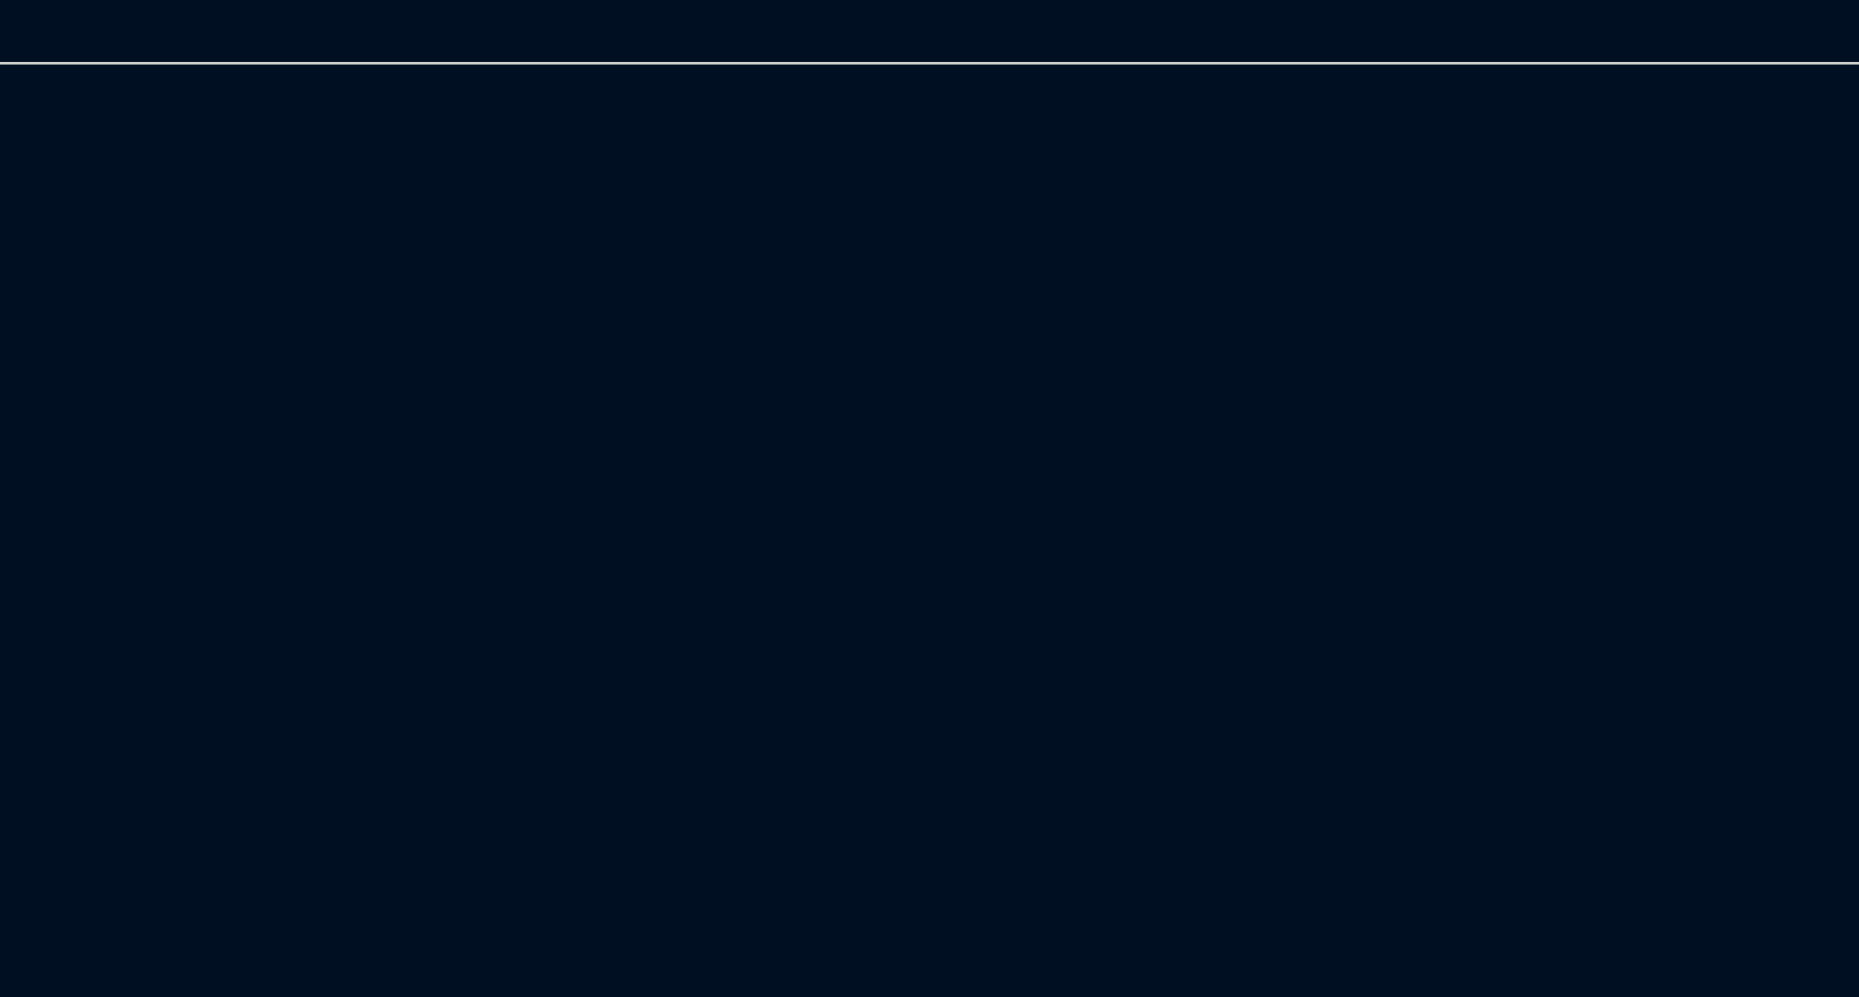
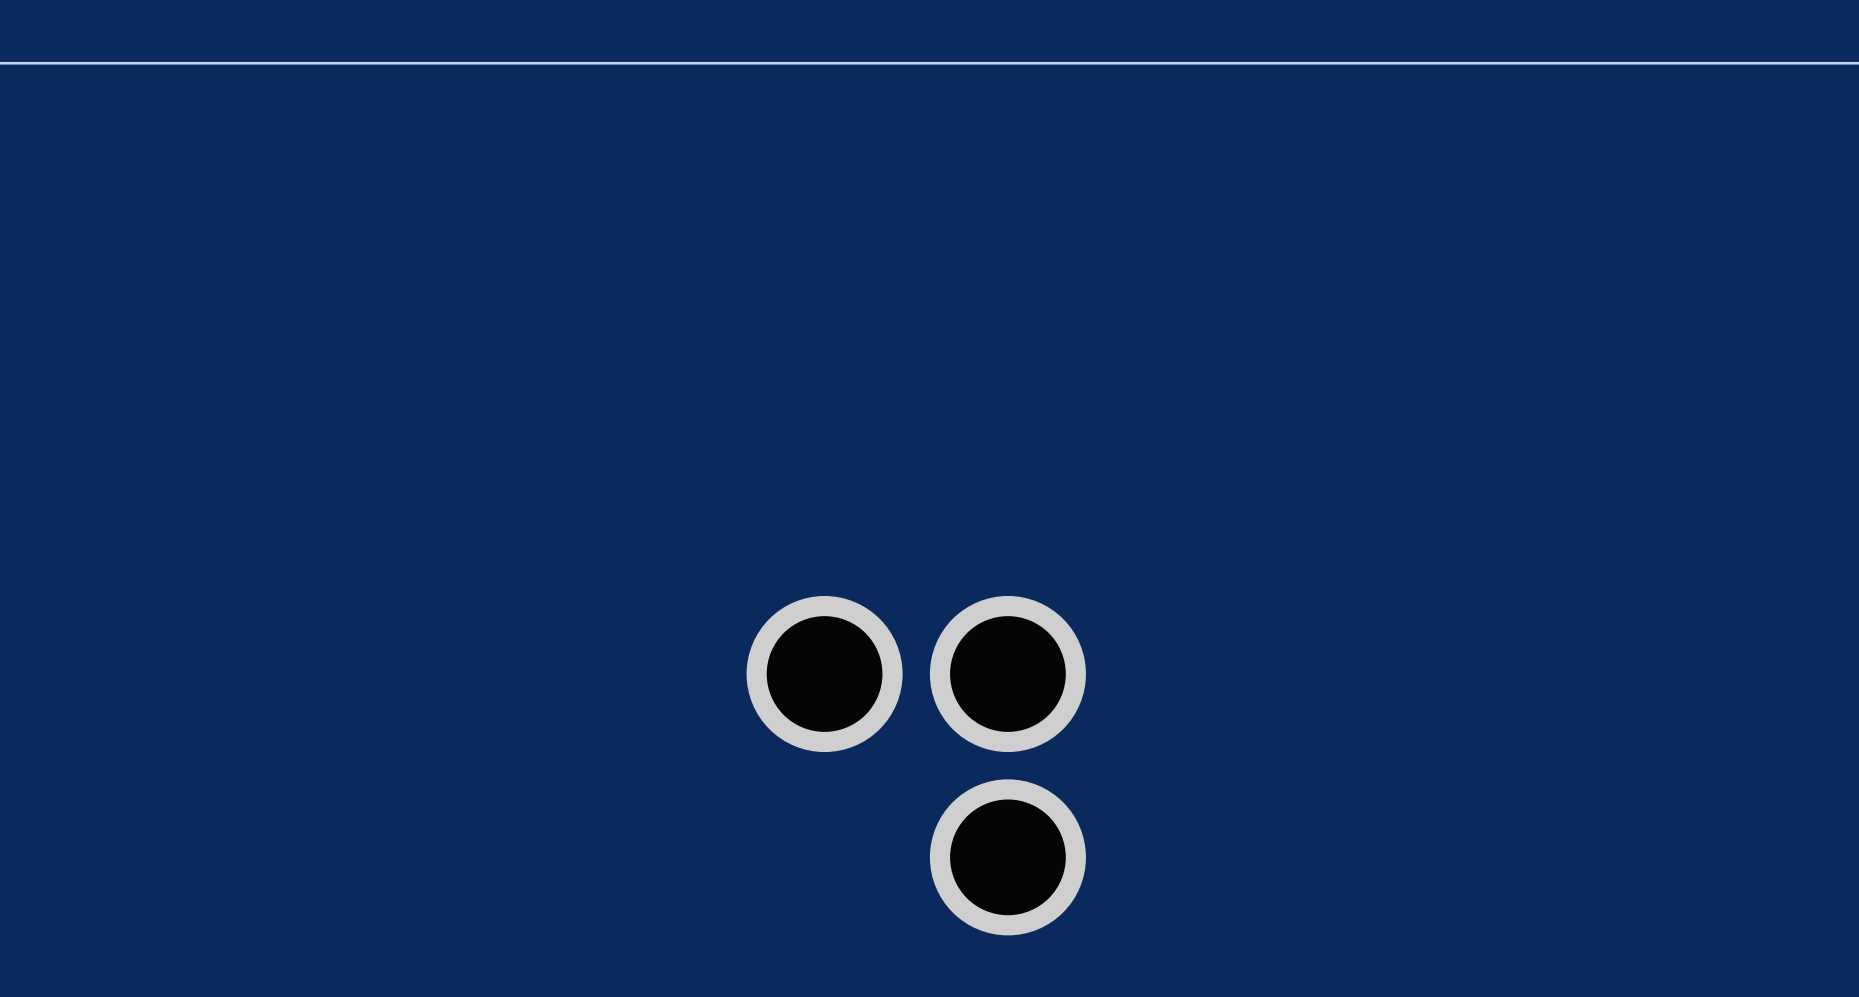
part: none -> (824, 674)
part: none -> (1007, 674)
part: none -> (1007, 857)

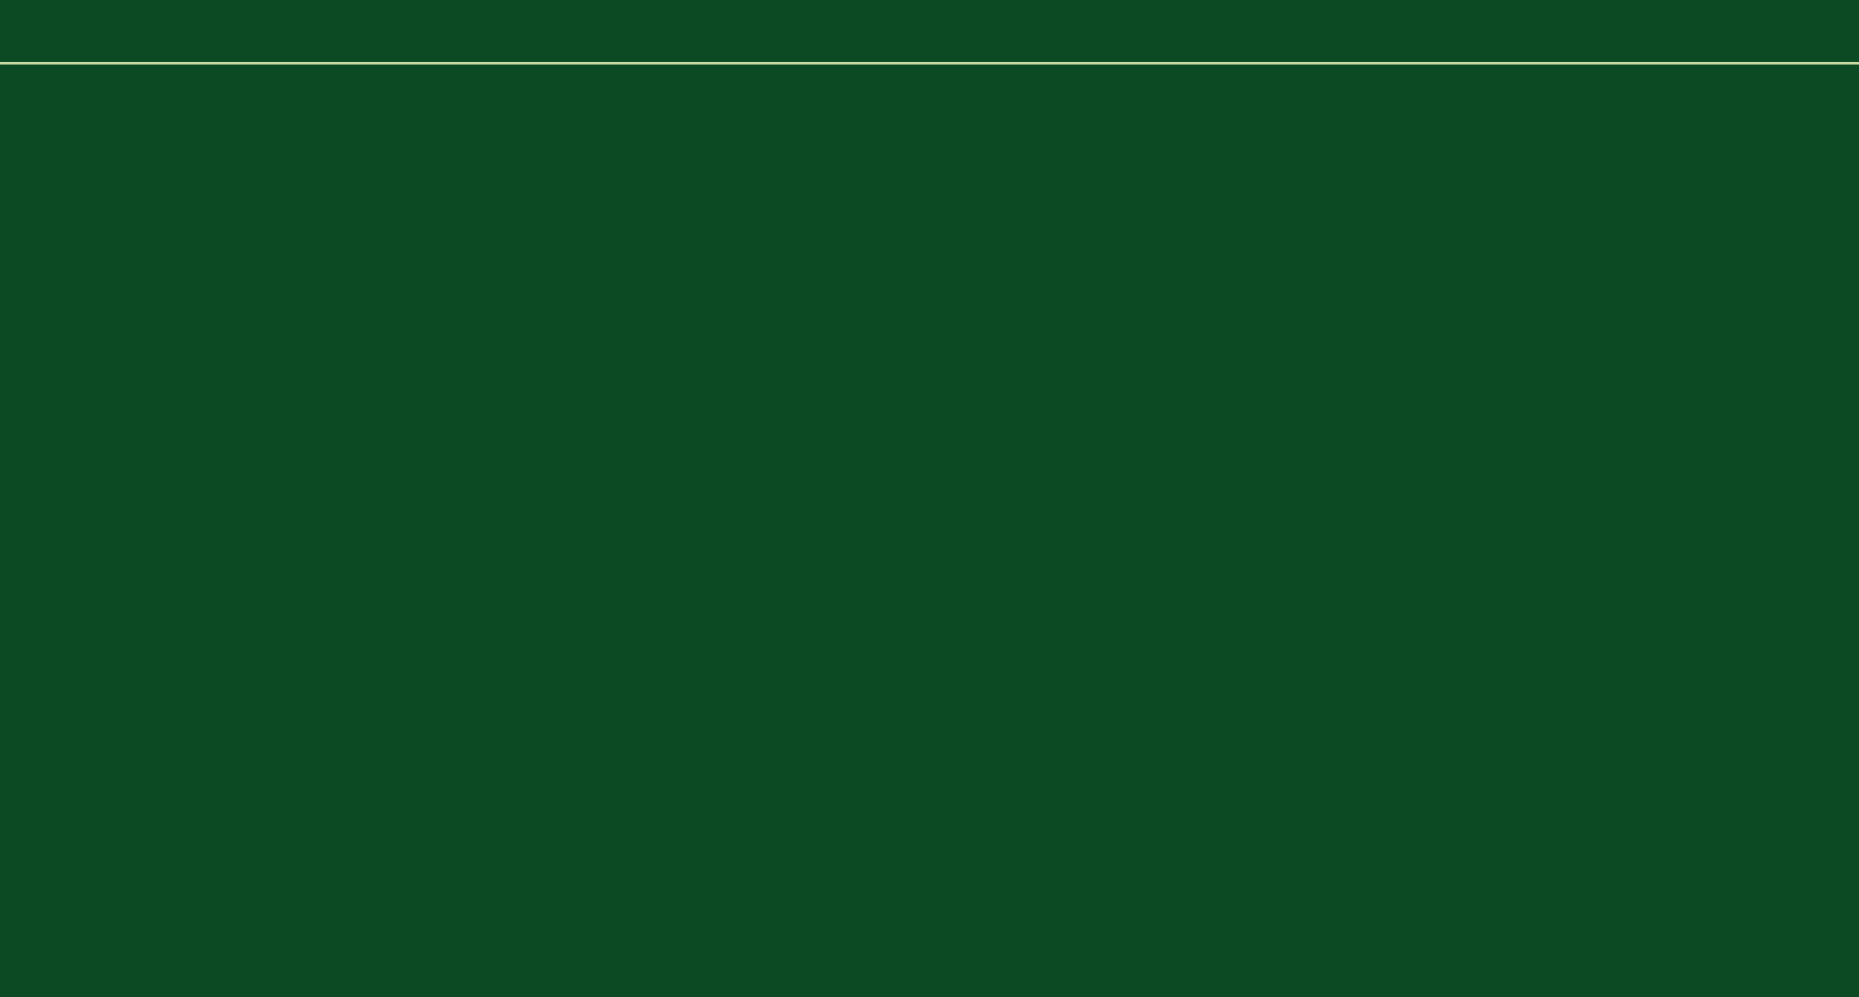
part: (824, 674) -> none
part: (1007, 674) -> none
part: (1007, 857) -> none

